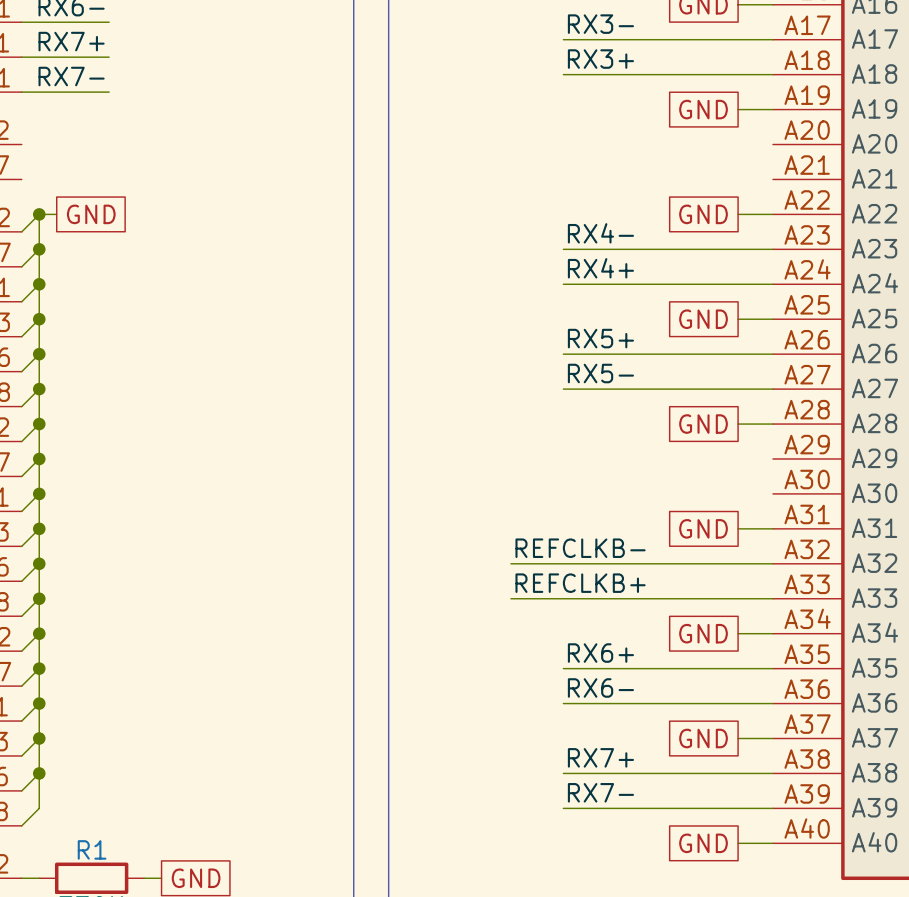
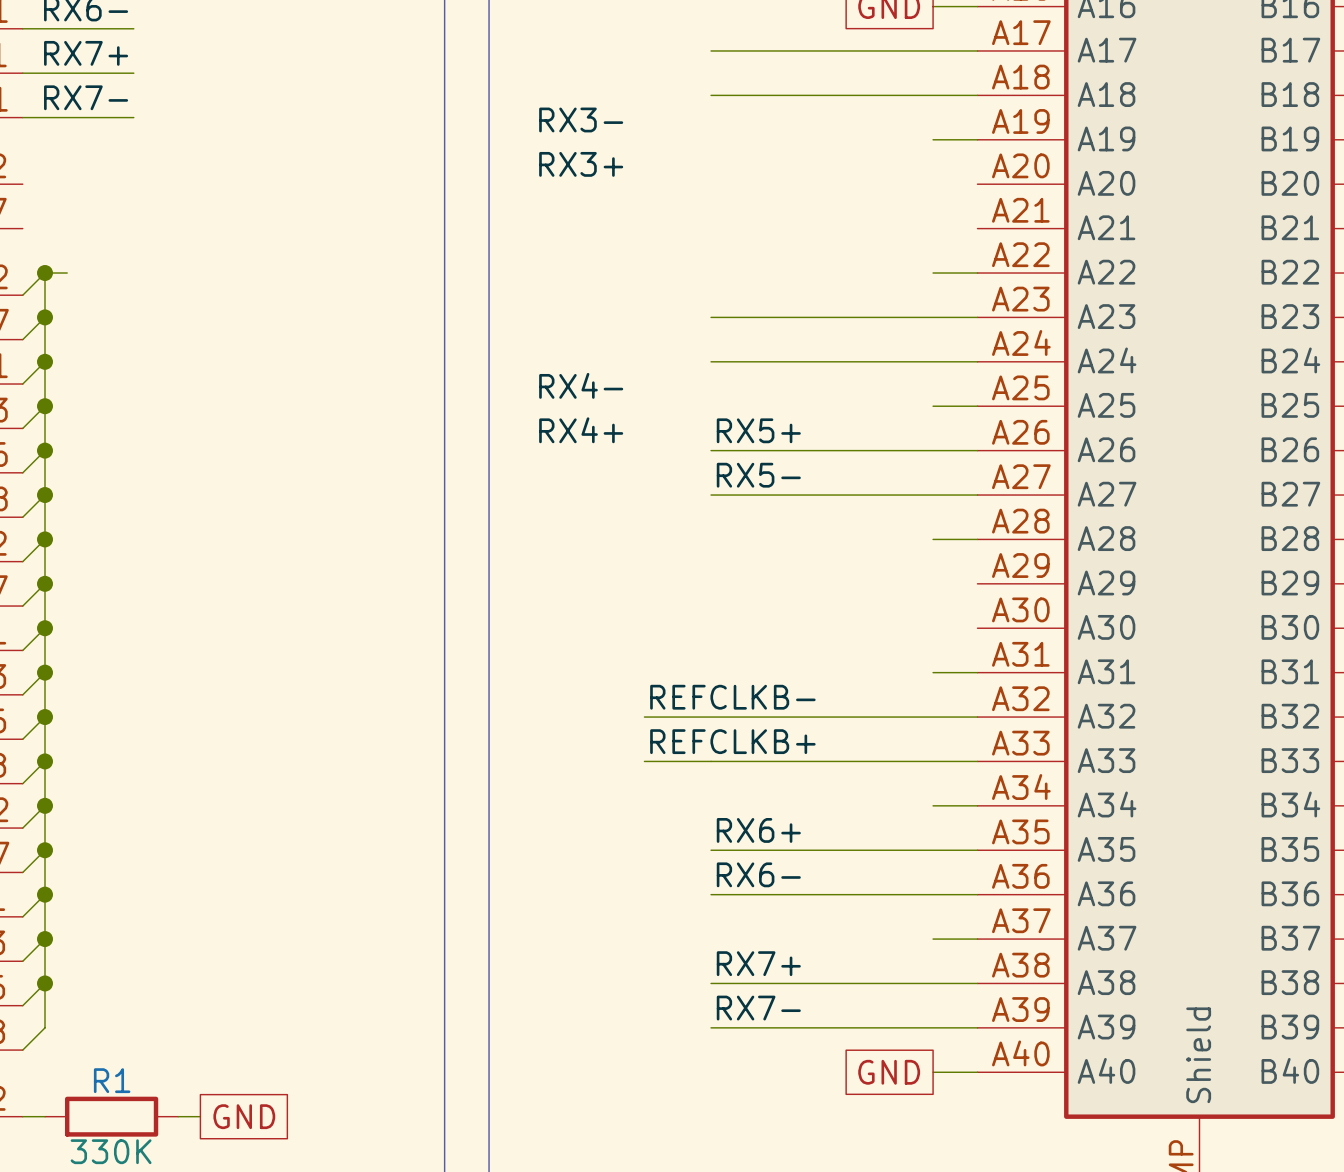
label position: RX3- (600, 24) -> RX3- (581, 119)
label position: RX3+ (600, 59) -> RX3+ (581, 164)
global label: GND (703, 109) -> none
global label: GND (91, 214) -> none
global label: GND (703, 214) -> none
label position: RX4- (600, 233) -> RX4- (581, 385)
label position: RX4+ (600, 268) -> RX4+ (581, 430)
global label: GND (703, 319) -> none
global label: GND (703, 424) -> none
global label: GND (703, 528) -> none
global label: GND (703, 633) -> none
global label: GND (703, 738) -> none

